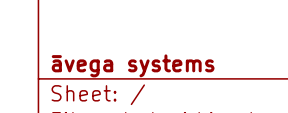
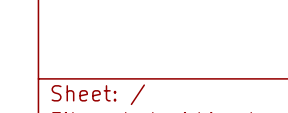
title block: āvega systems (133, 65) -> none

